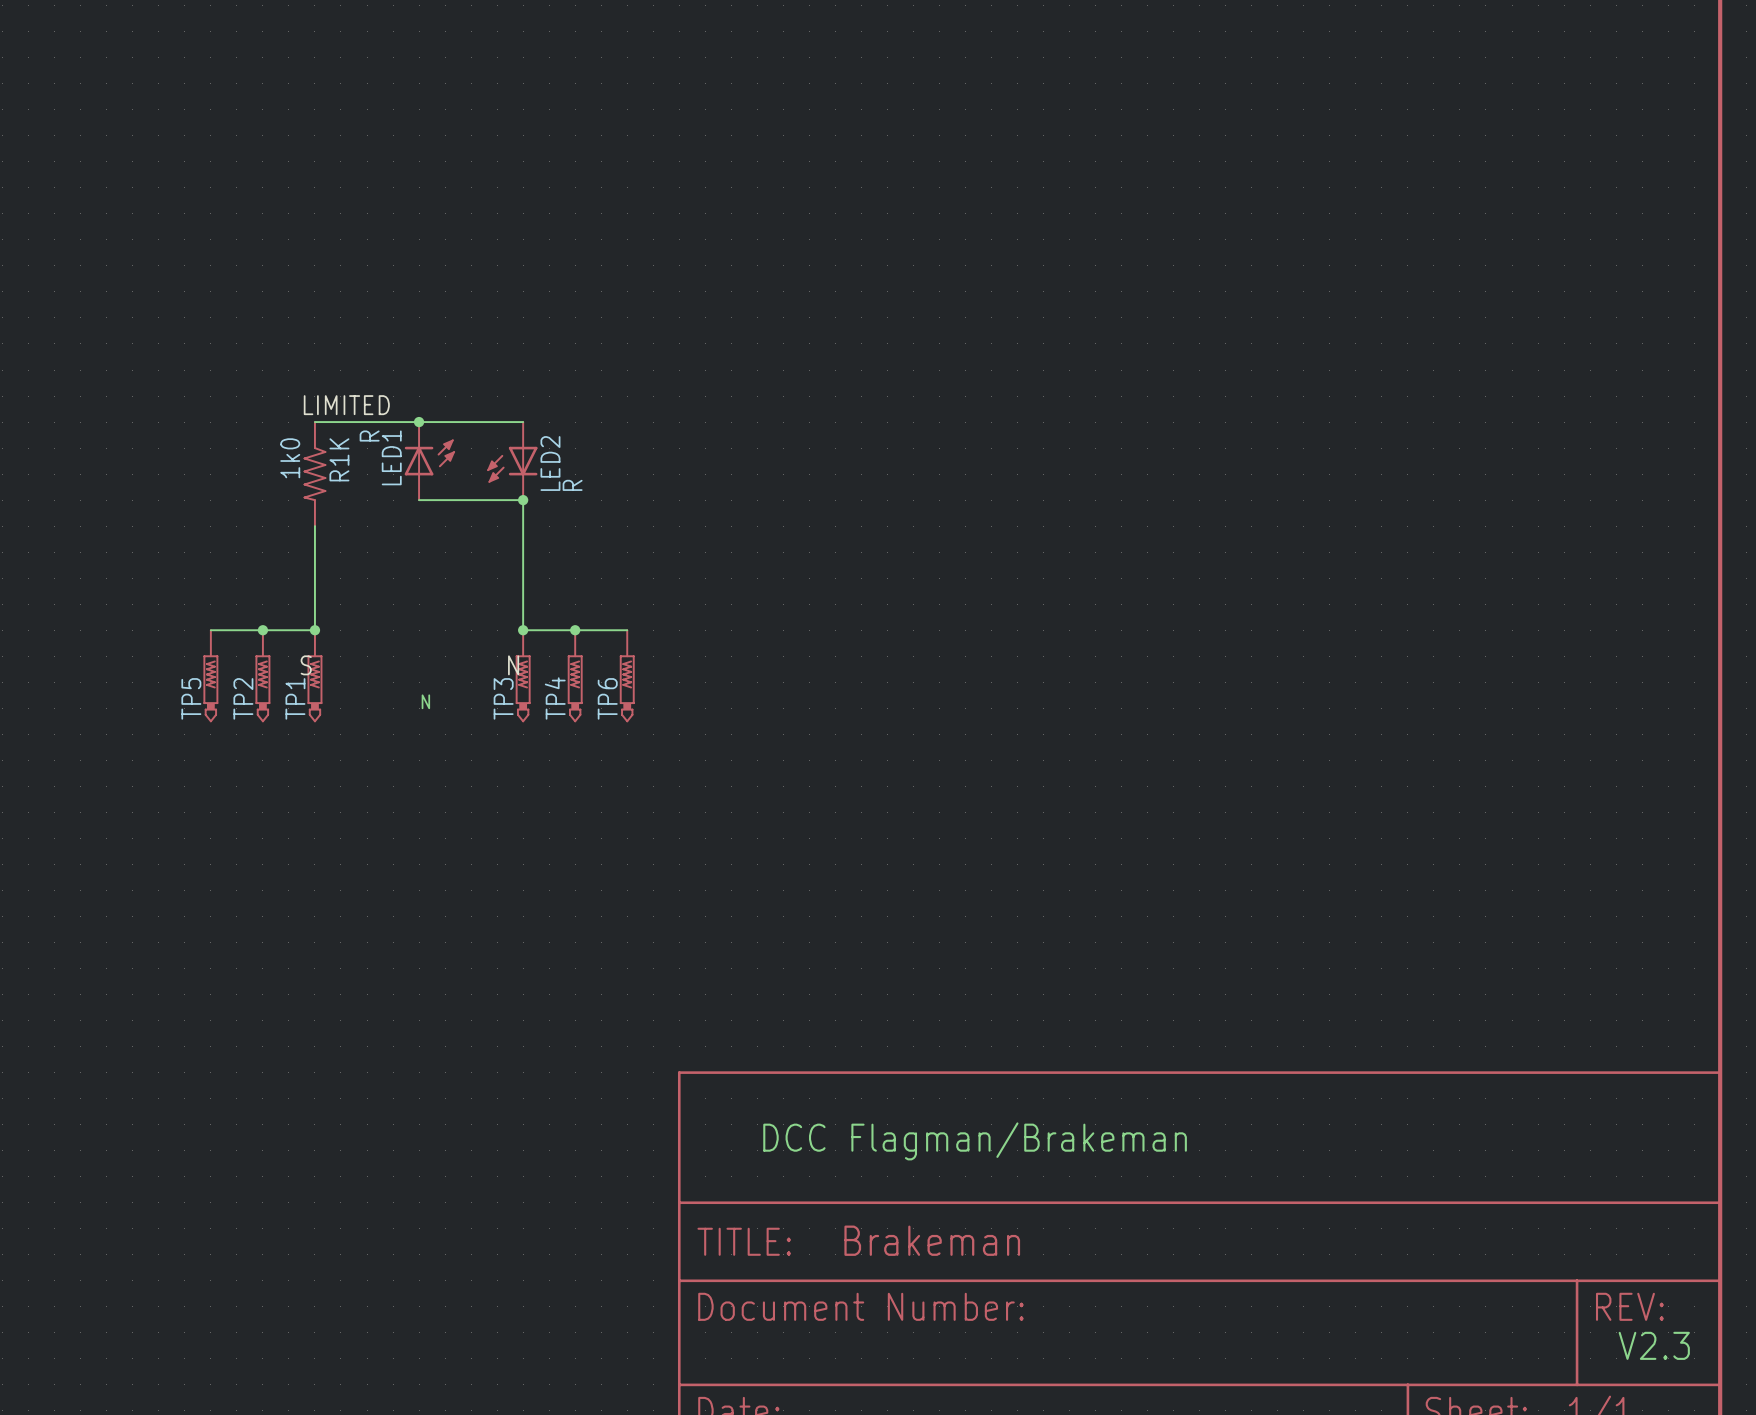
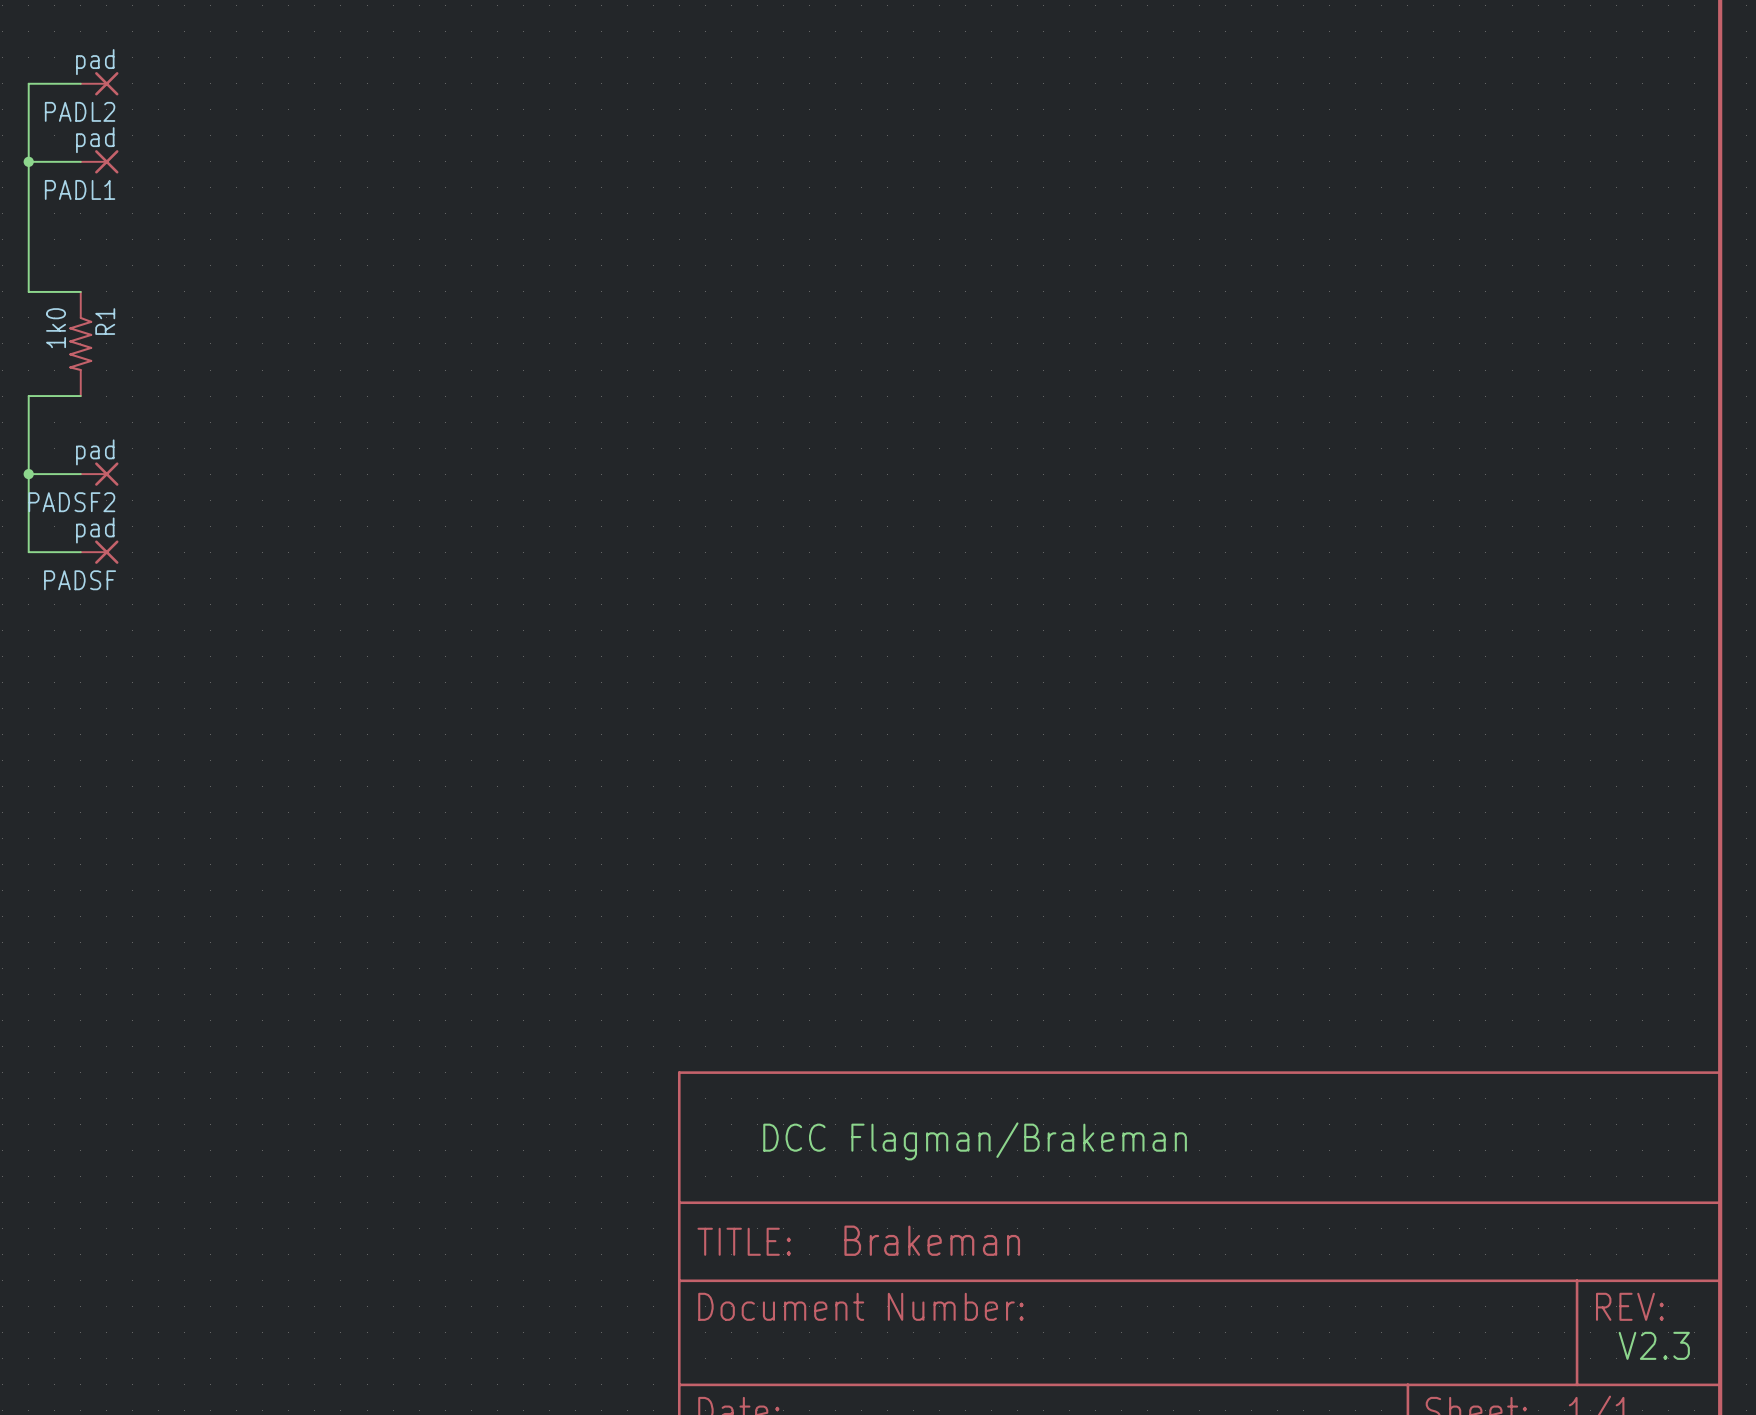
wire: none -> (80, 83) (28, 83) (28, 291) (80, 291)
PADL2: none -> pad (99, 83)
wire: none -> (28, 161) (80, 161)
junction: none -> (28, 161)
PADL1: none -> pad (99, 161)
R1: none -> 1k0 (80, 343)
wire: none -> (80, 396) (28, 396) (28, 552) (80, 552)
label: LIMITED (346, 405) -> none
wire: (314, 422) (523, 422) -> none
junction: (419, 422) -> none
LED1: R (429, 461) -> none
LED2: R (512, 461) -> none
wire: none -> (28, 474) (80, 474)
junction: none -> (28, 474)
PADSF2: none -> pad (99, 474)
R1K: 1k0 (314, 474) -> none
wire: (419, 500) (523, 500) (523, 630) (627, 630) -> none
junction: (523, 500) -> none
wire: (314, 526) (314, 630) (210, 630) -> none
PADSF: none -> pad (99, 552)
junction: (262, 630) -> none
junction: (314, 630) -> none
junction: (523, 630) -> none
junction: (575, 630) -> none
label: S (306, 665) -> none
label: N (513, 665) -> none
TP5: (210, 676) -> none
TP2: (262, 676) -> none
TP1: (314, 676) -> none
TP3: (523, 676) -> none
TP4: (575, 676) -> none
TP6: (627, 676) -> none
text: N (425, 701) -> none

